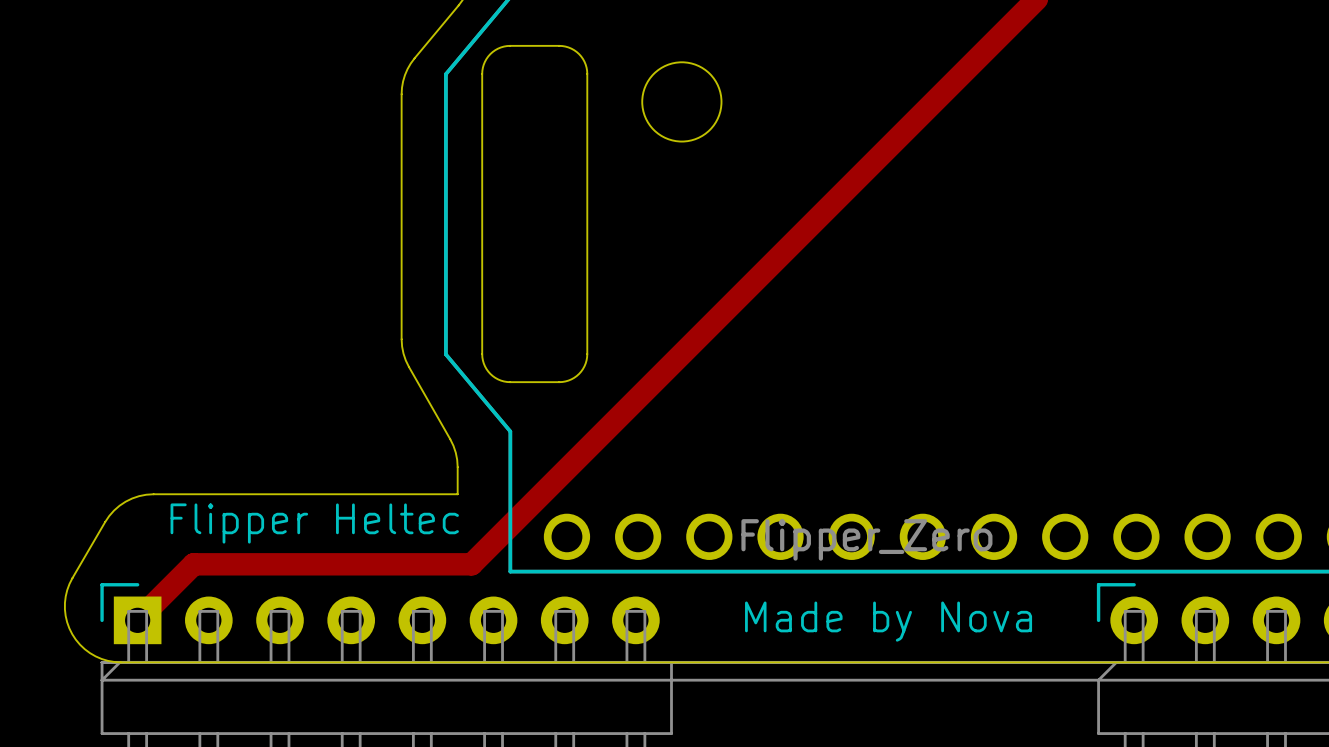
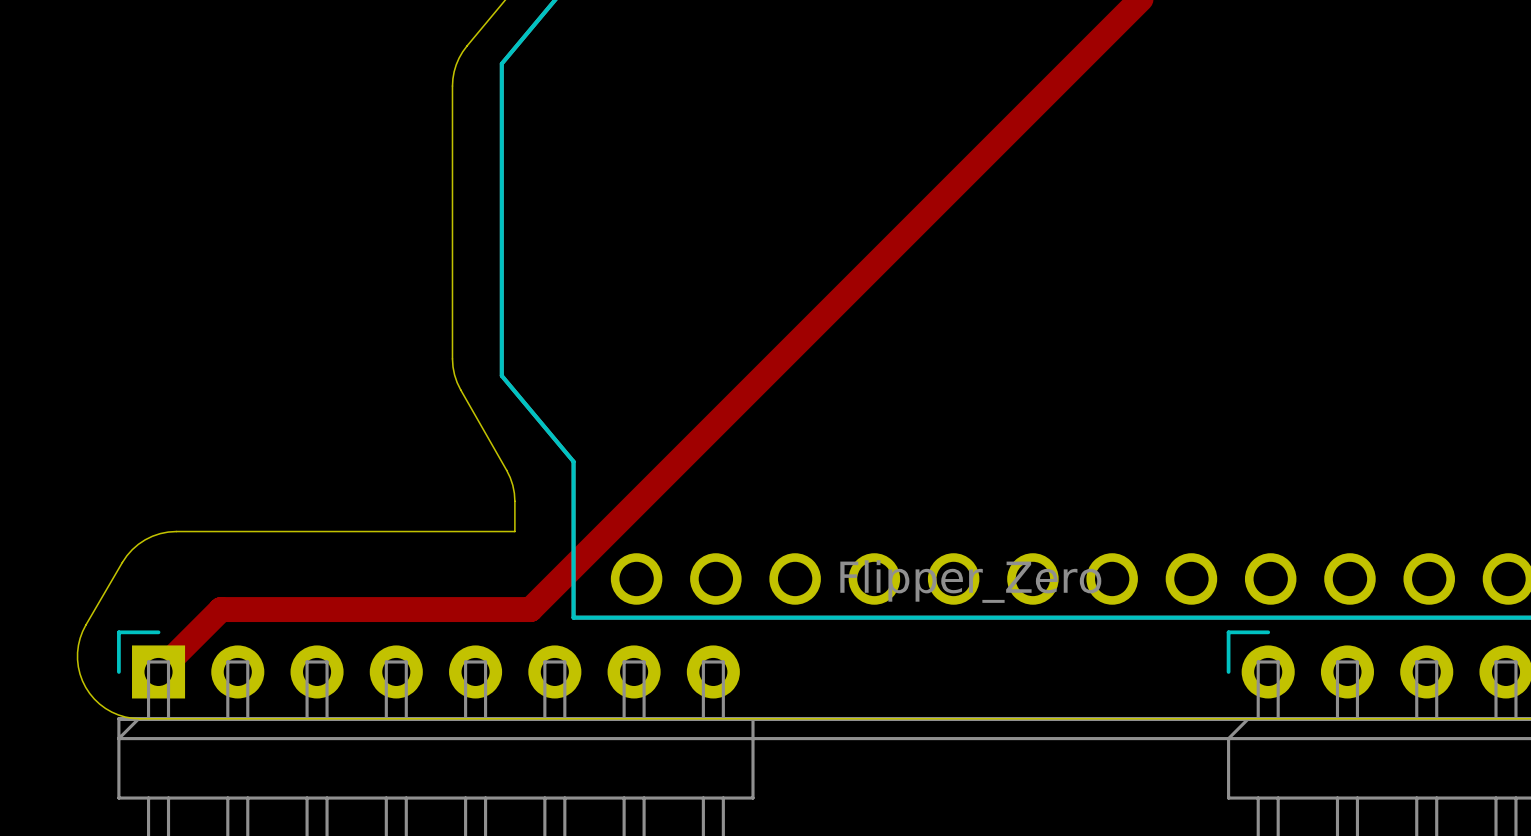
board edge: (510, 45) (568, 47) (581, 56) (587, 70) (587, 357) (584, 366) (579, 373) (571, 379) (562, 381) (500, 380) (488, 371) (482, 357) (482, 70) (484, 61) (490, 54) (498, 48) (510, 45) -> none
round board edge: [641, 61, 723, 143] -> none
text: Flipper Heltec (314, 523) -> none
text: Made by Nova (888, 621) -> none

